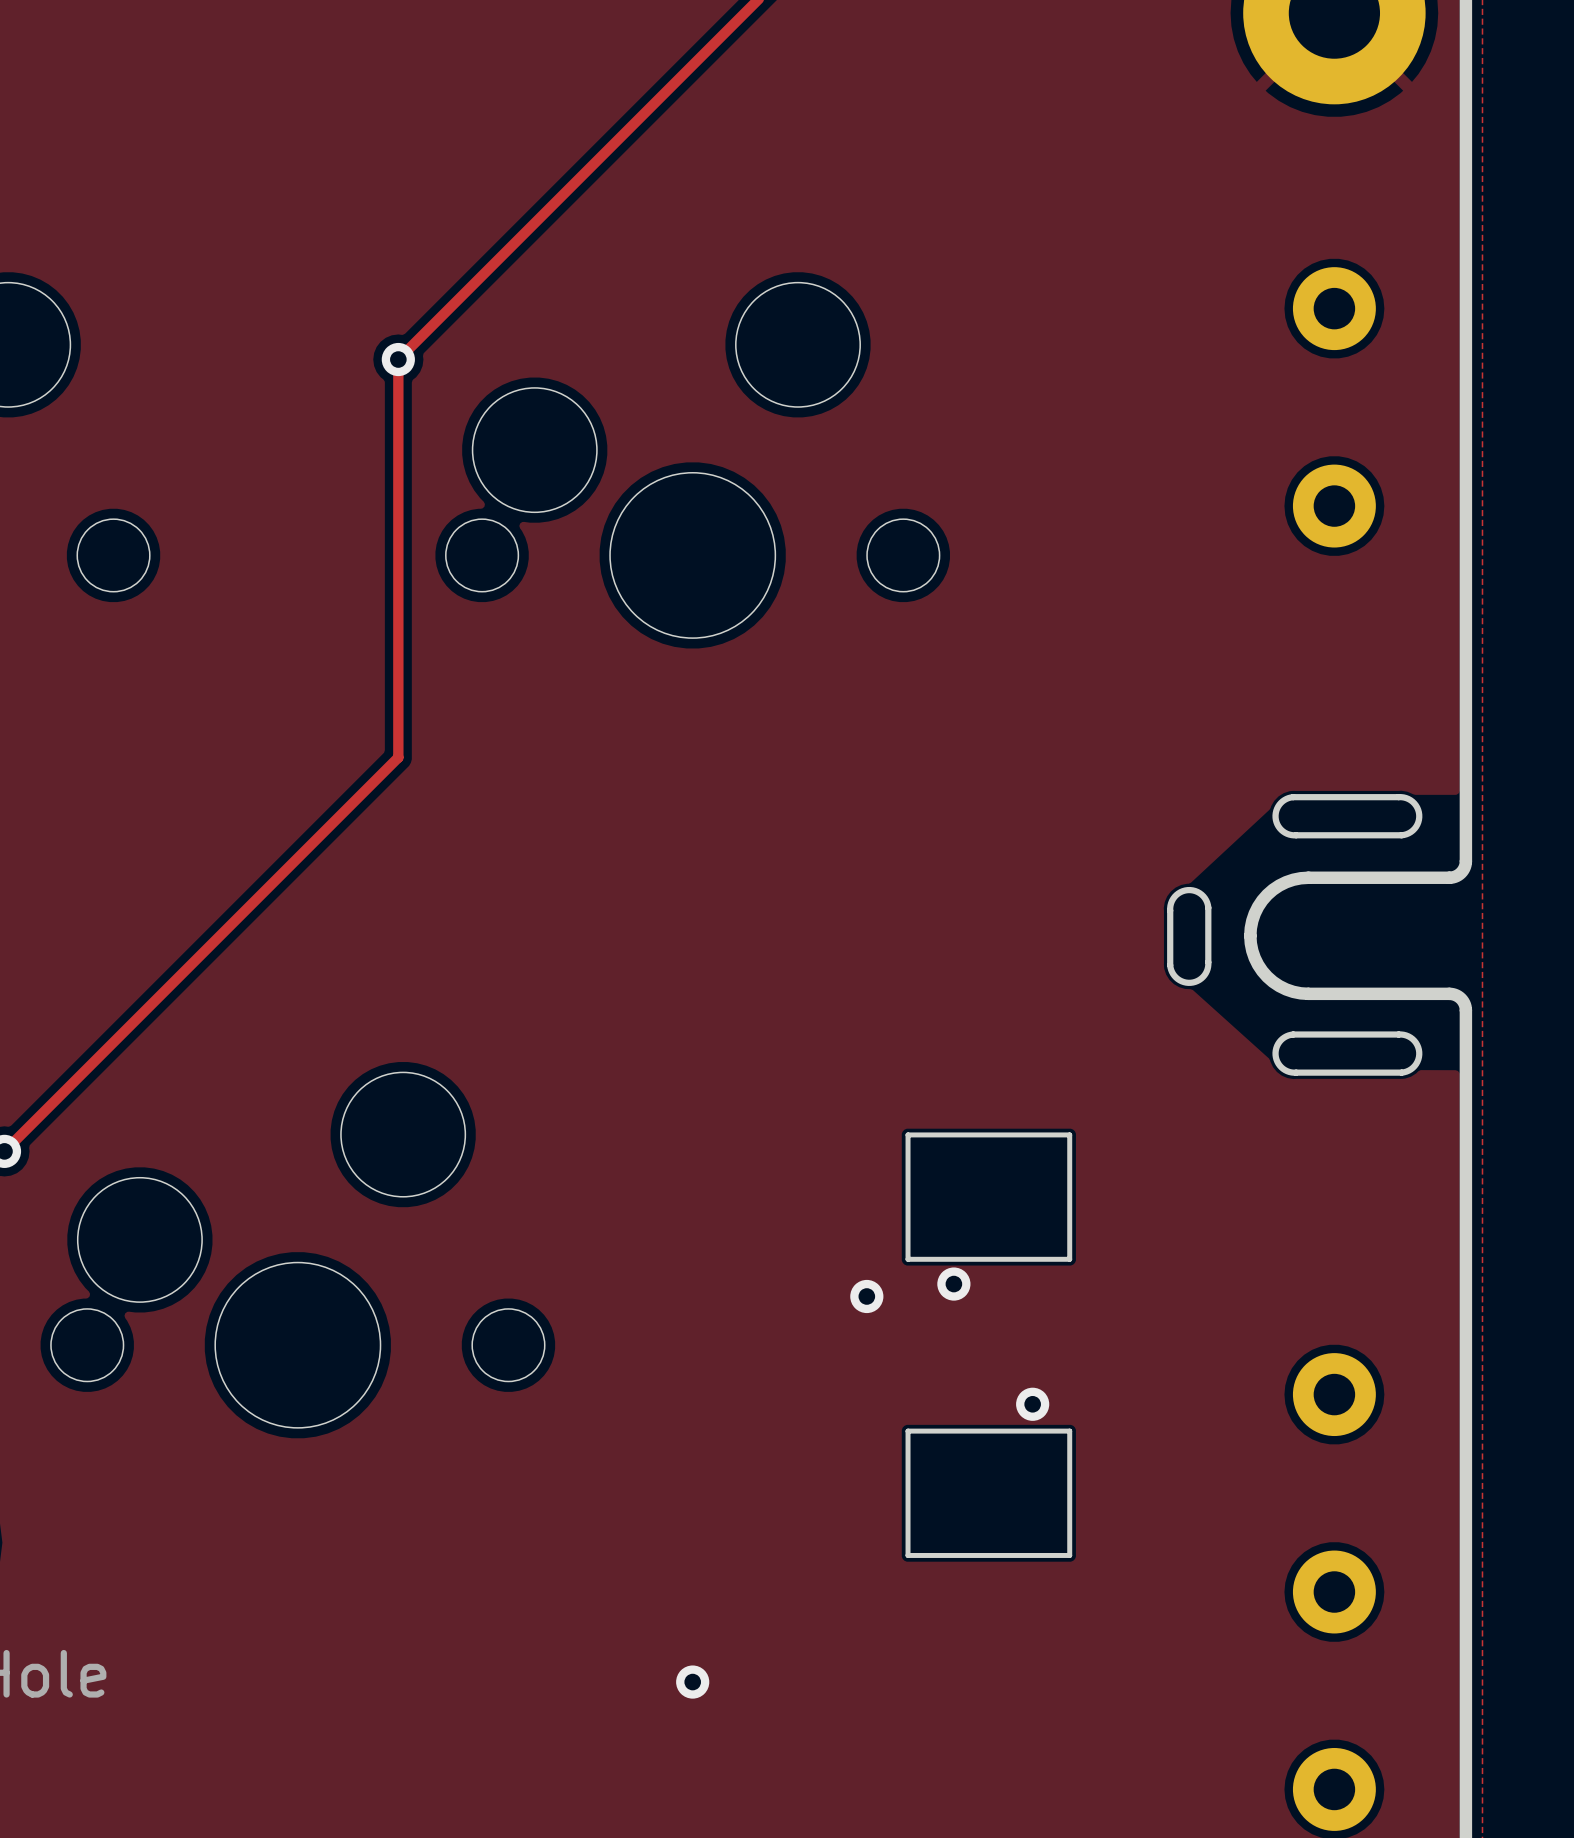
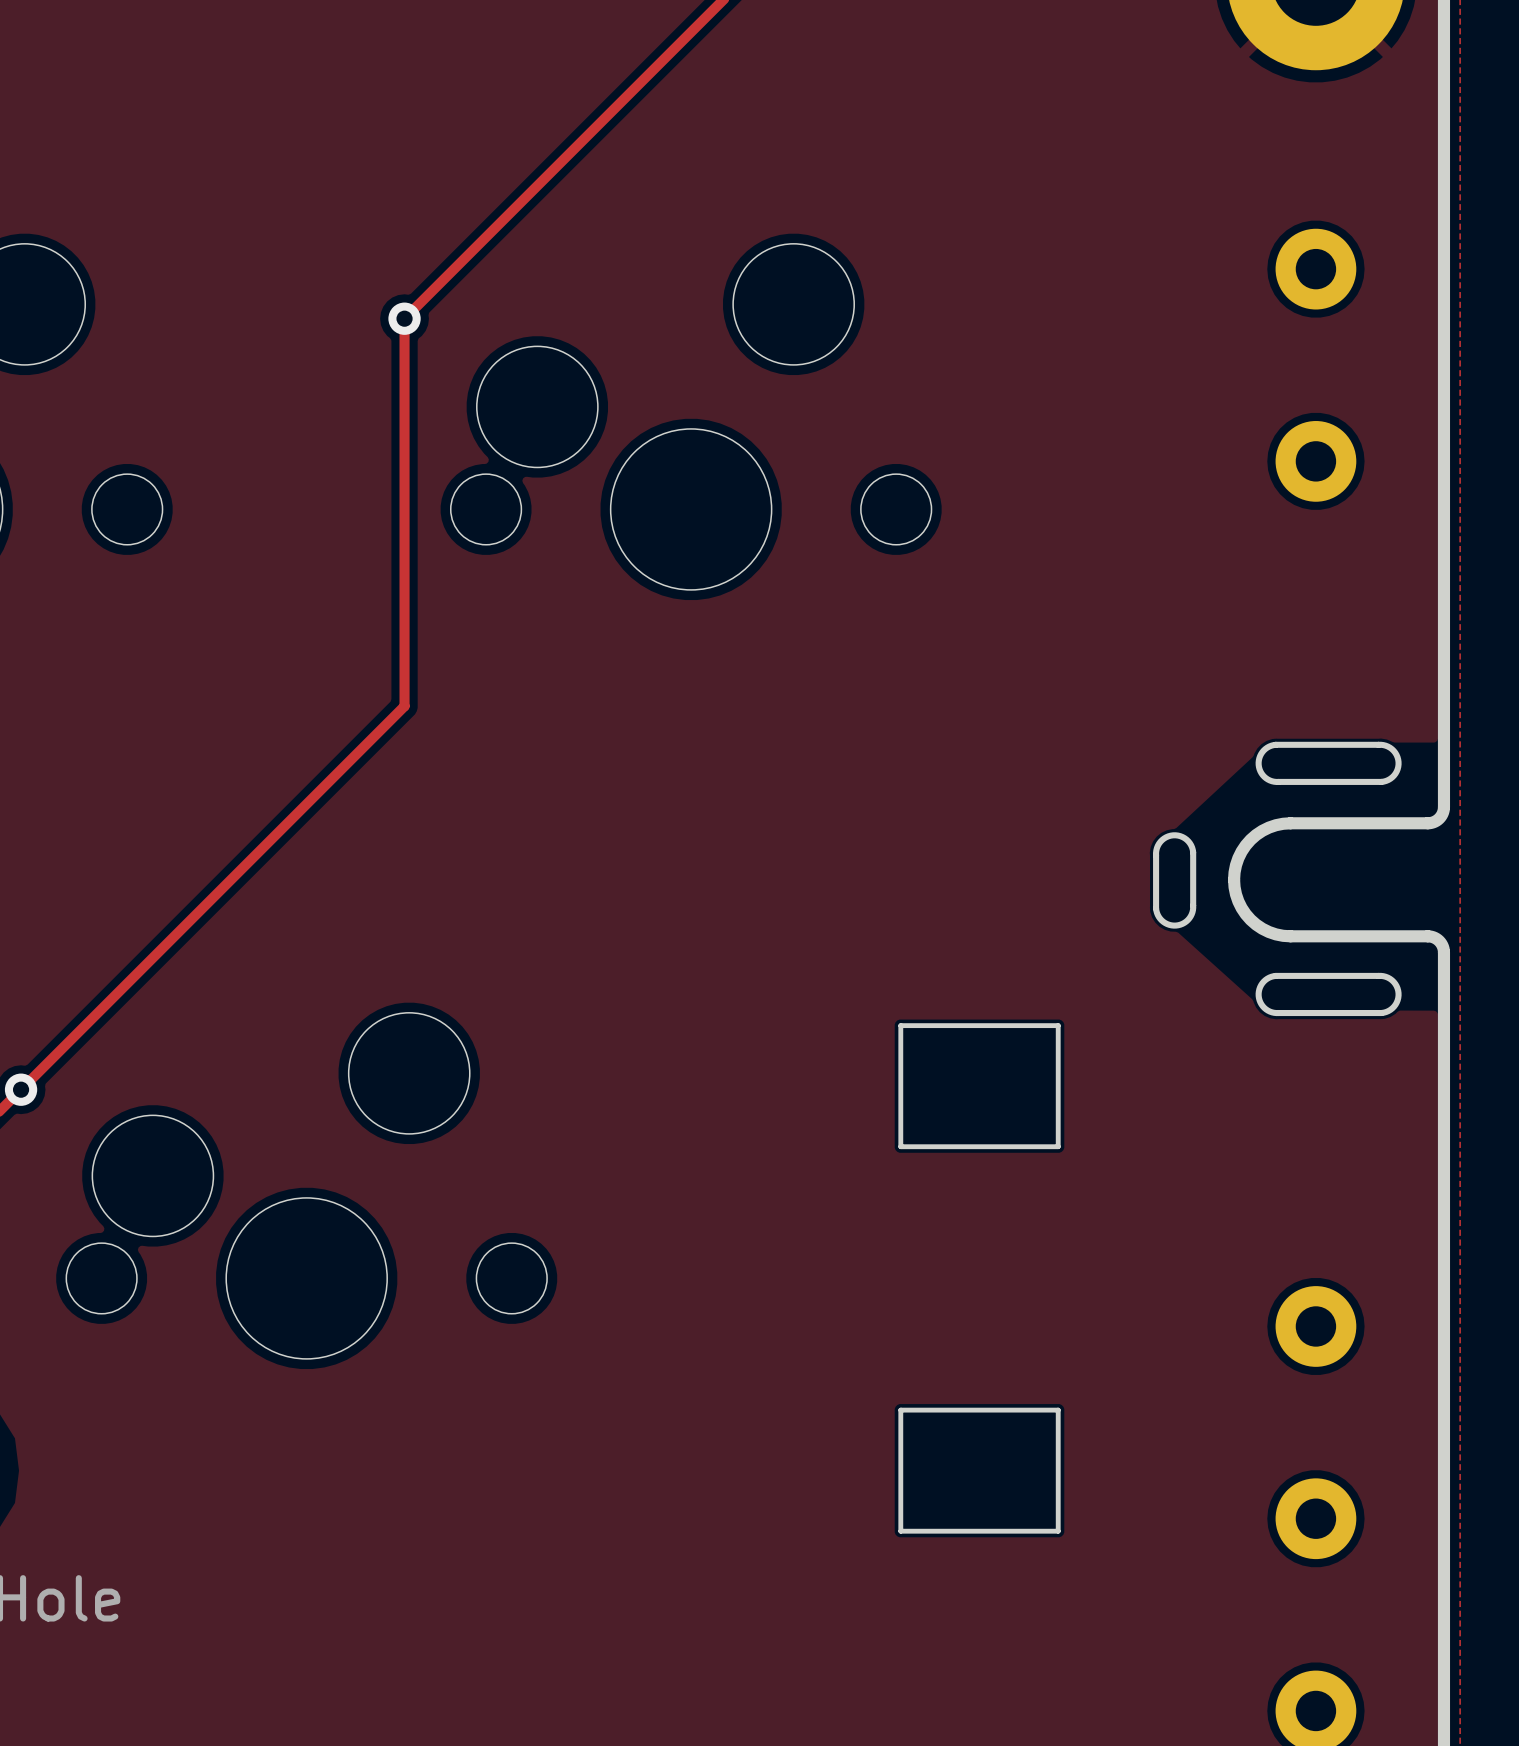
part position: (988, 1197) -> (979, 1086)
via: (953, 1284) -> none
via: (866, 1296) -> none
via: (1032, 1404) -> none
part position: (988, 1493) -> (979, 1470)
via: (692, 1682) -> none

